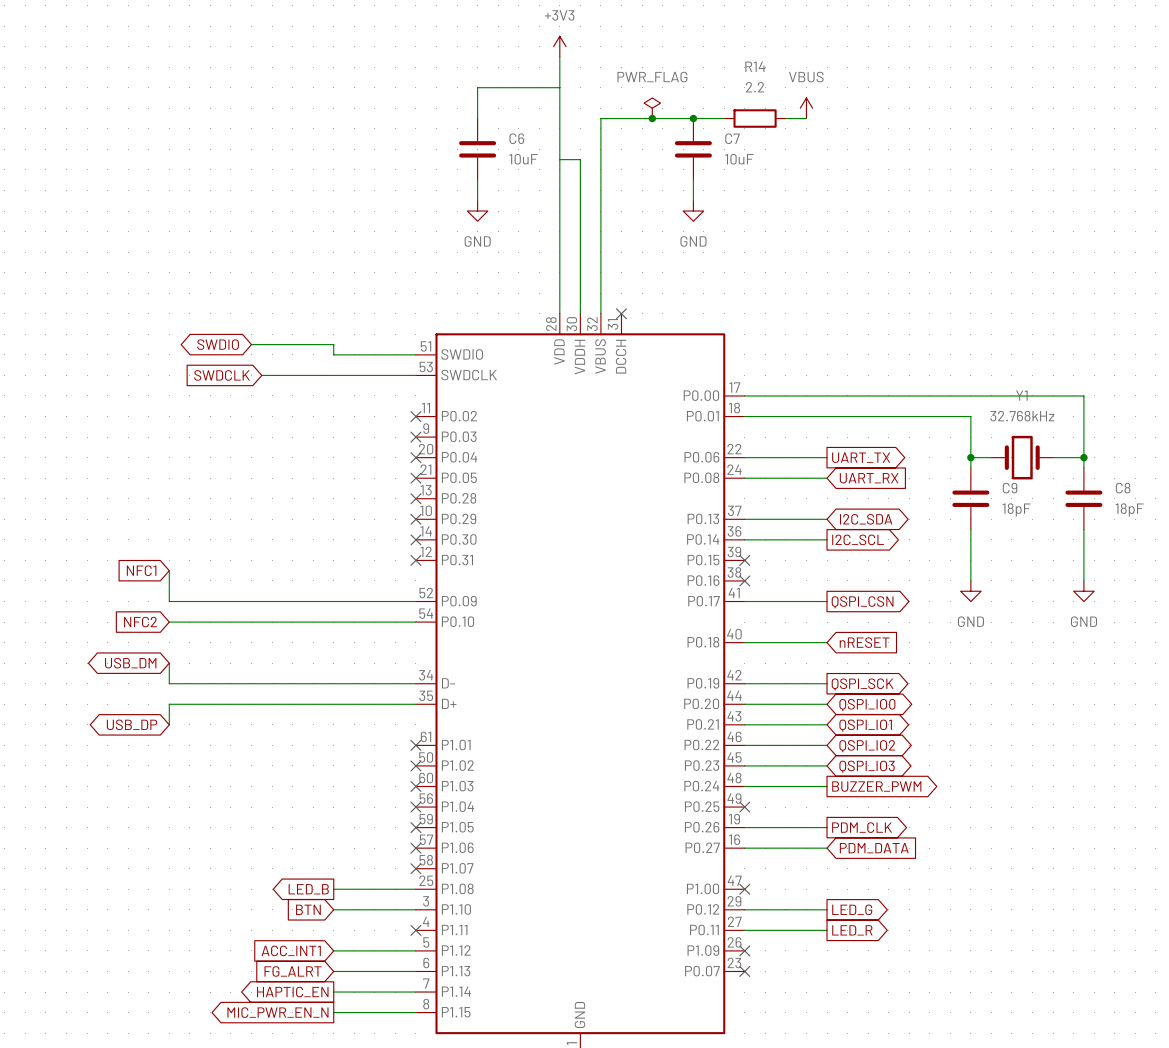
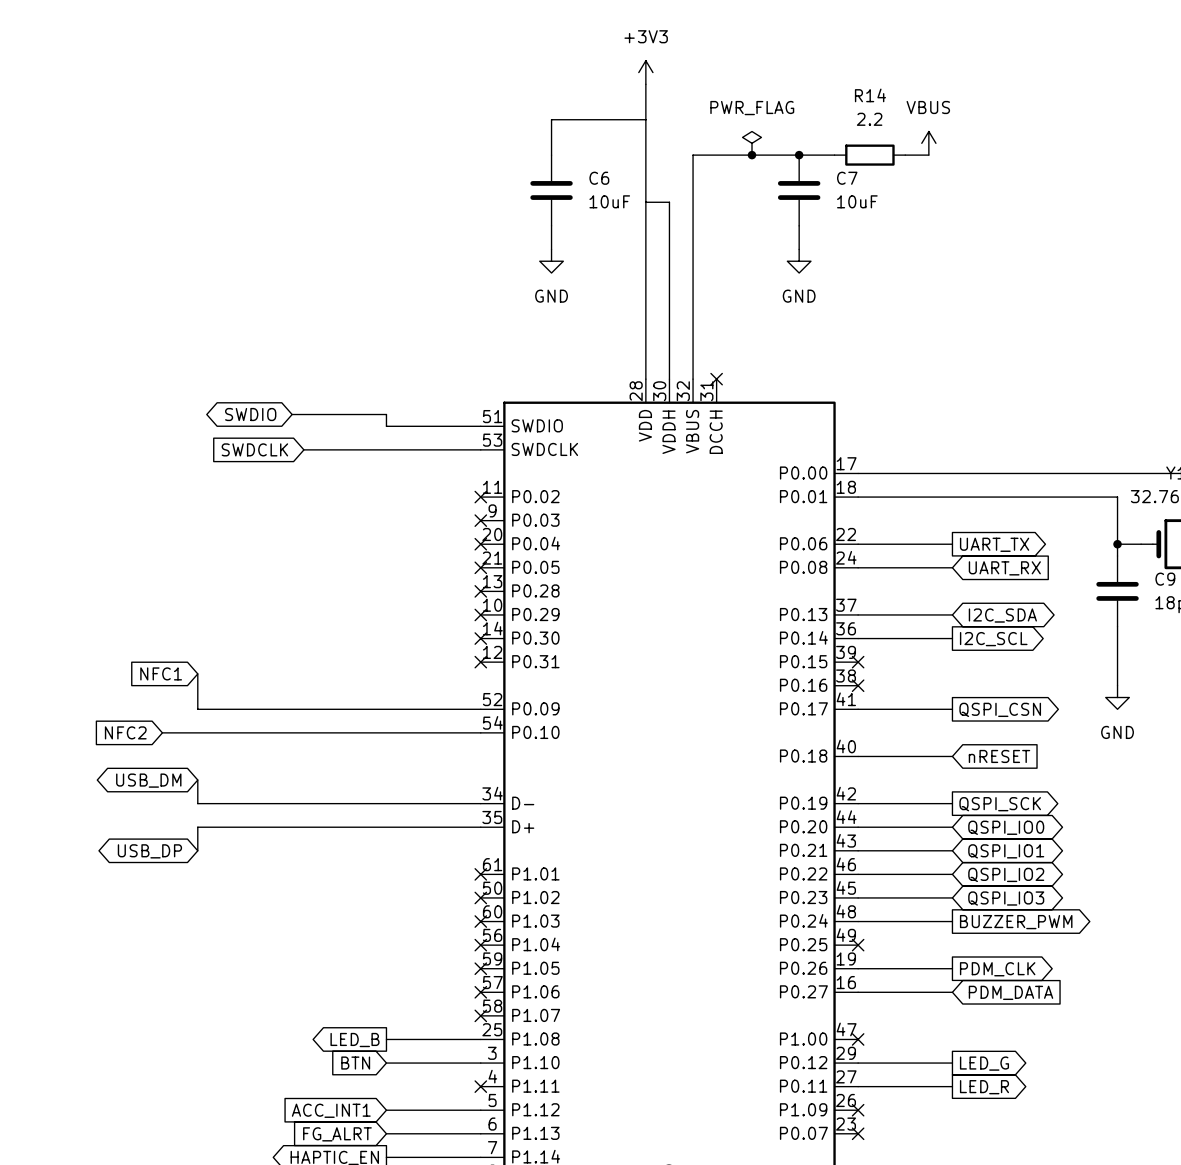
wire: none -> (162, 732) (197, 732)
global label position: NFC2 (140, 622) -> NFC2 (125, 732)

